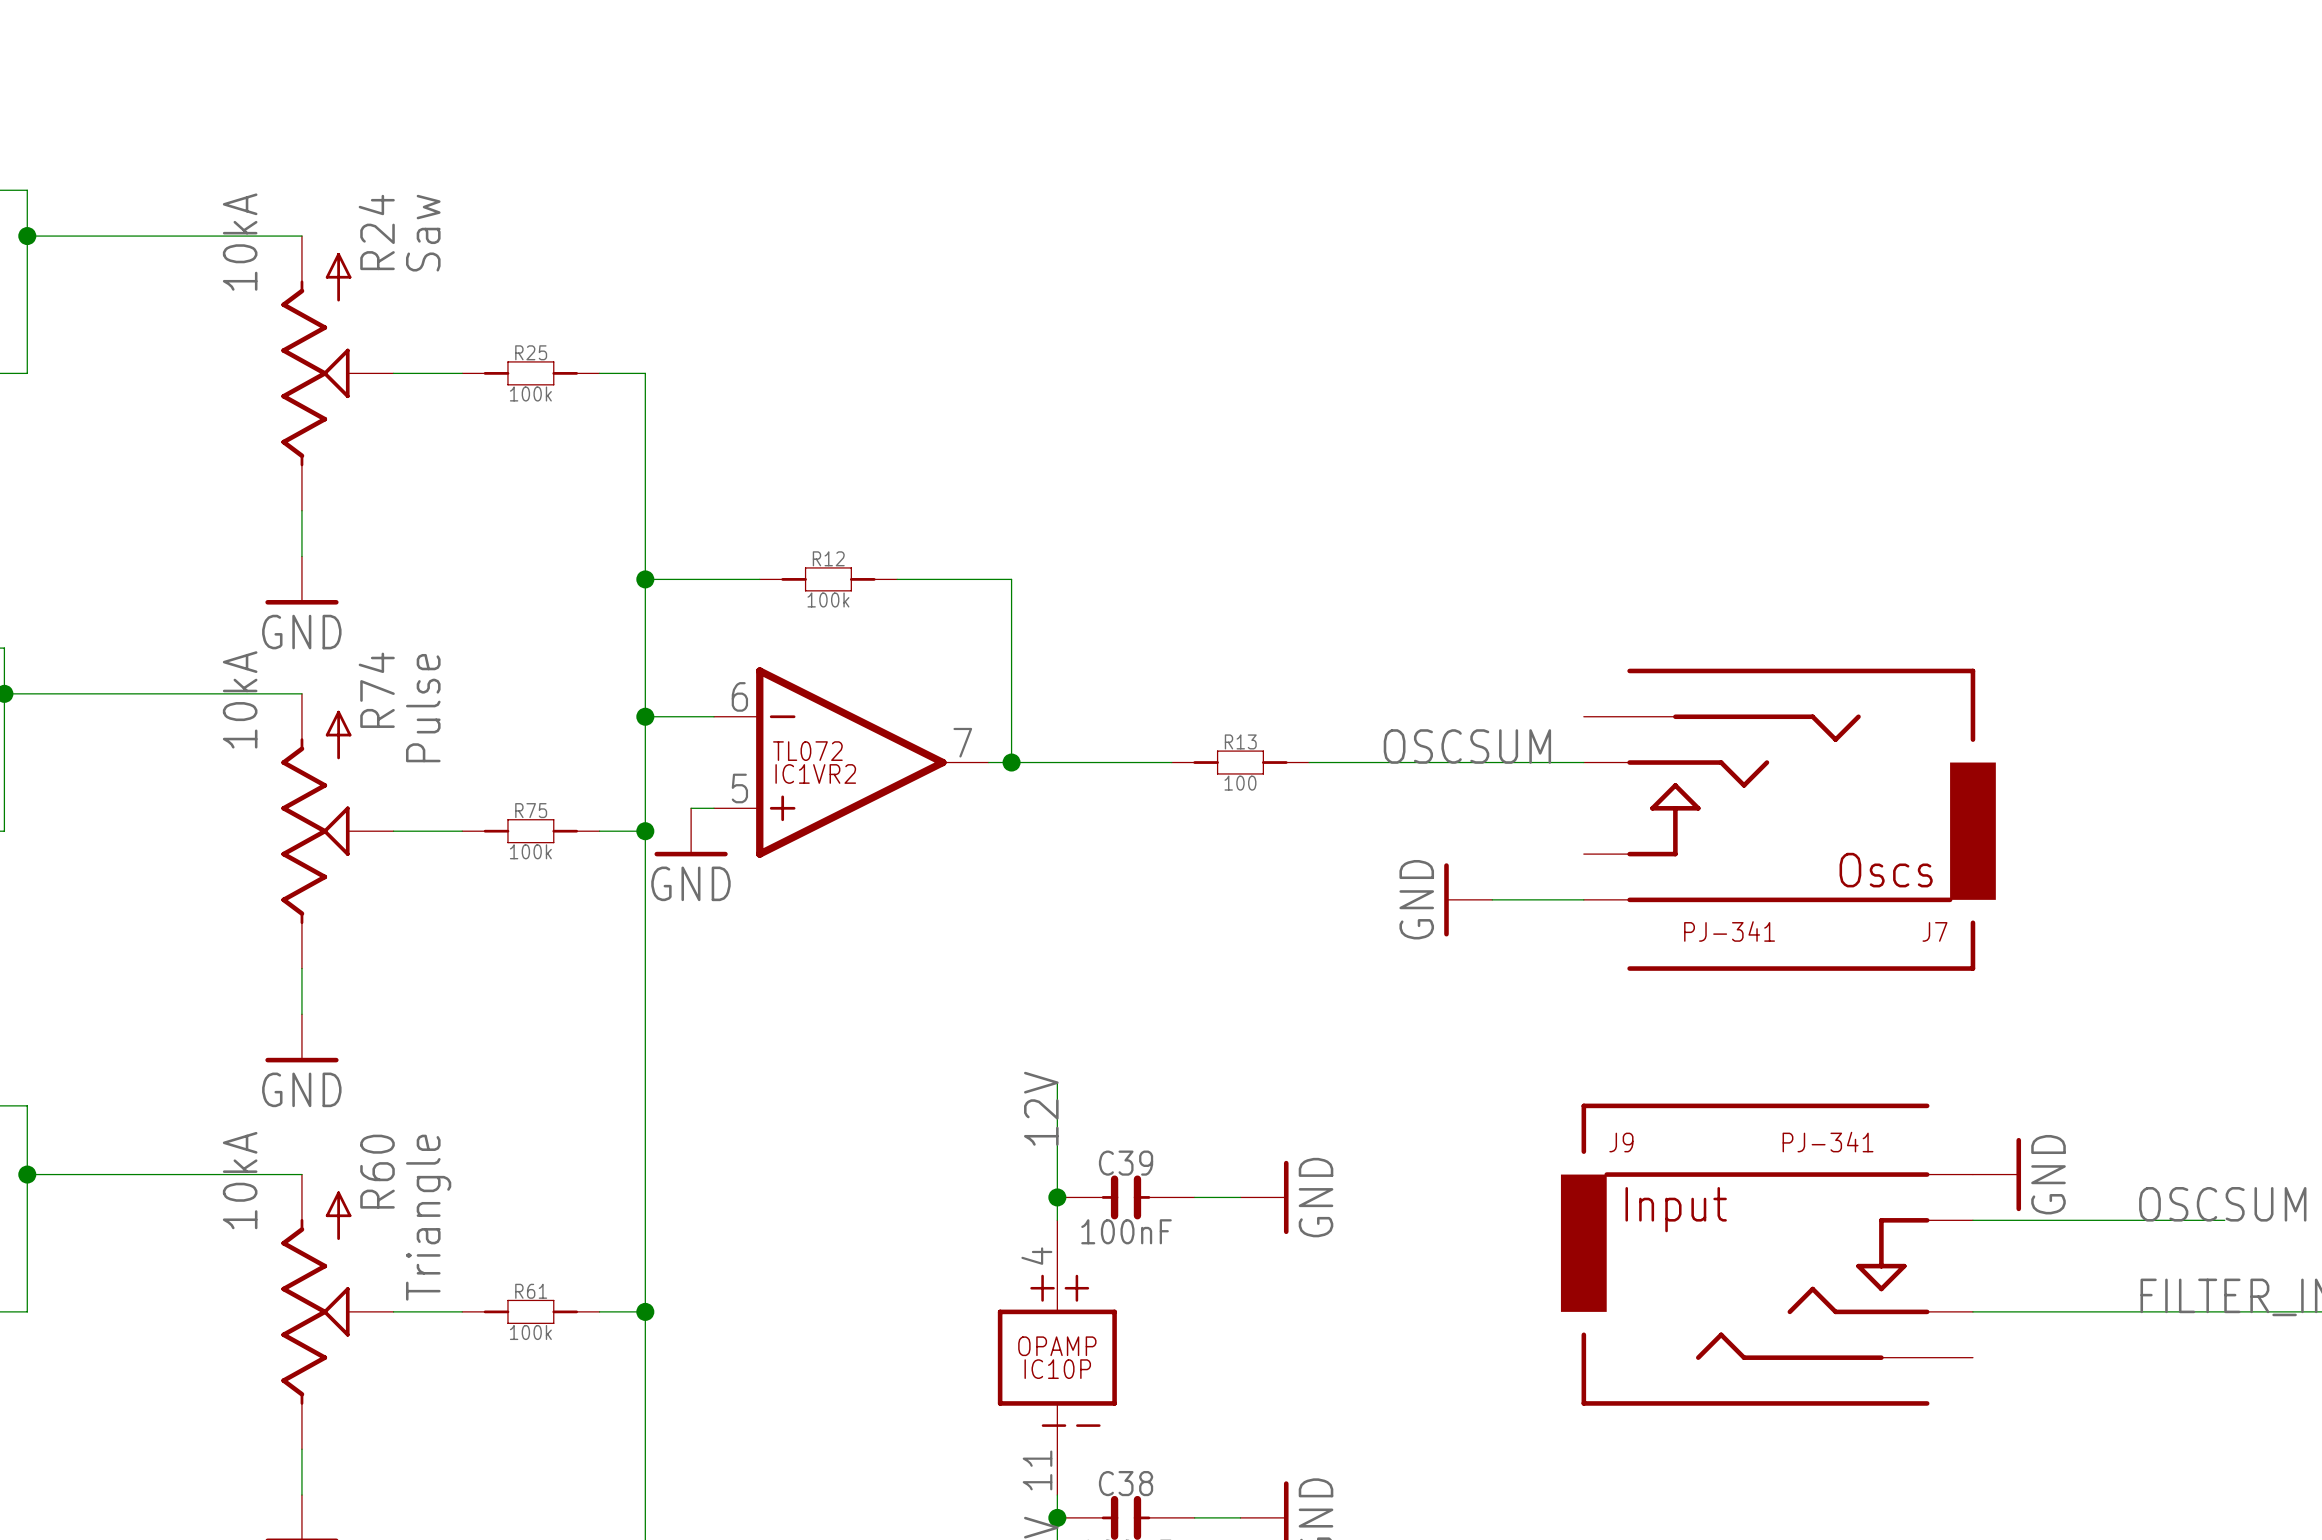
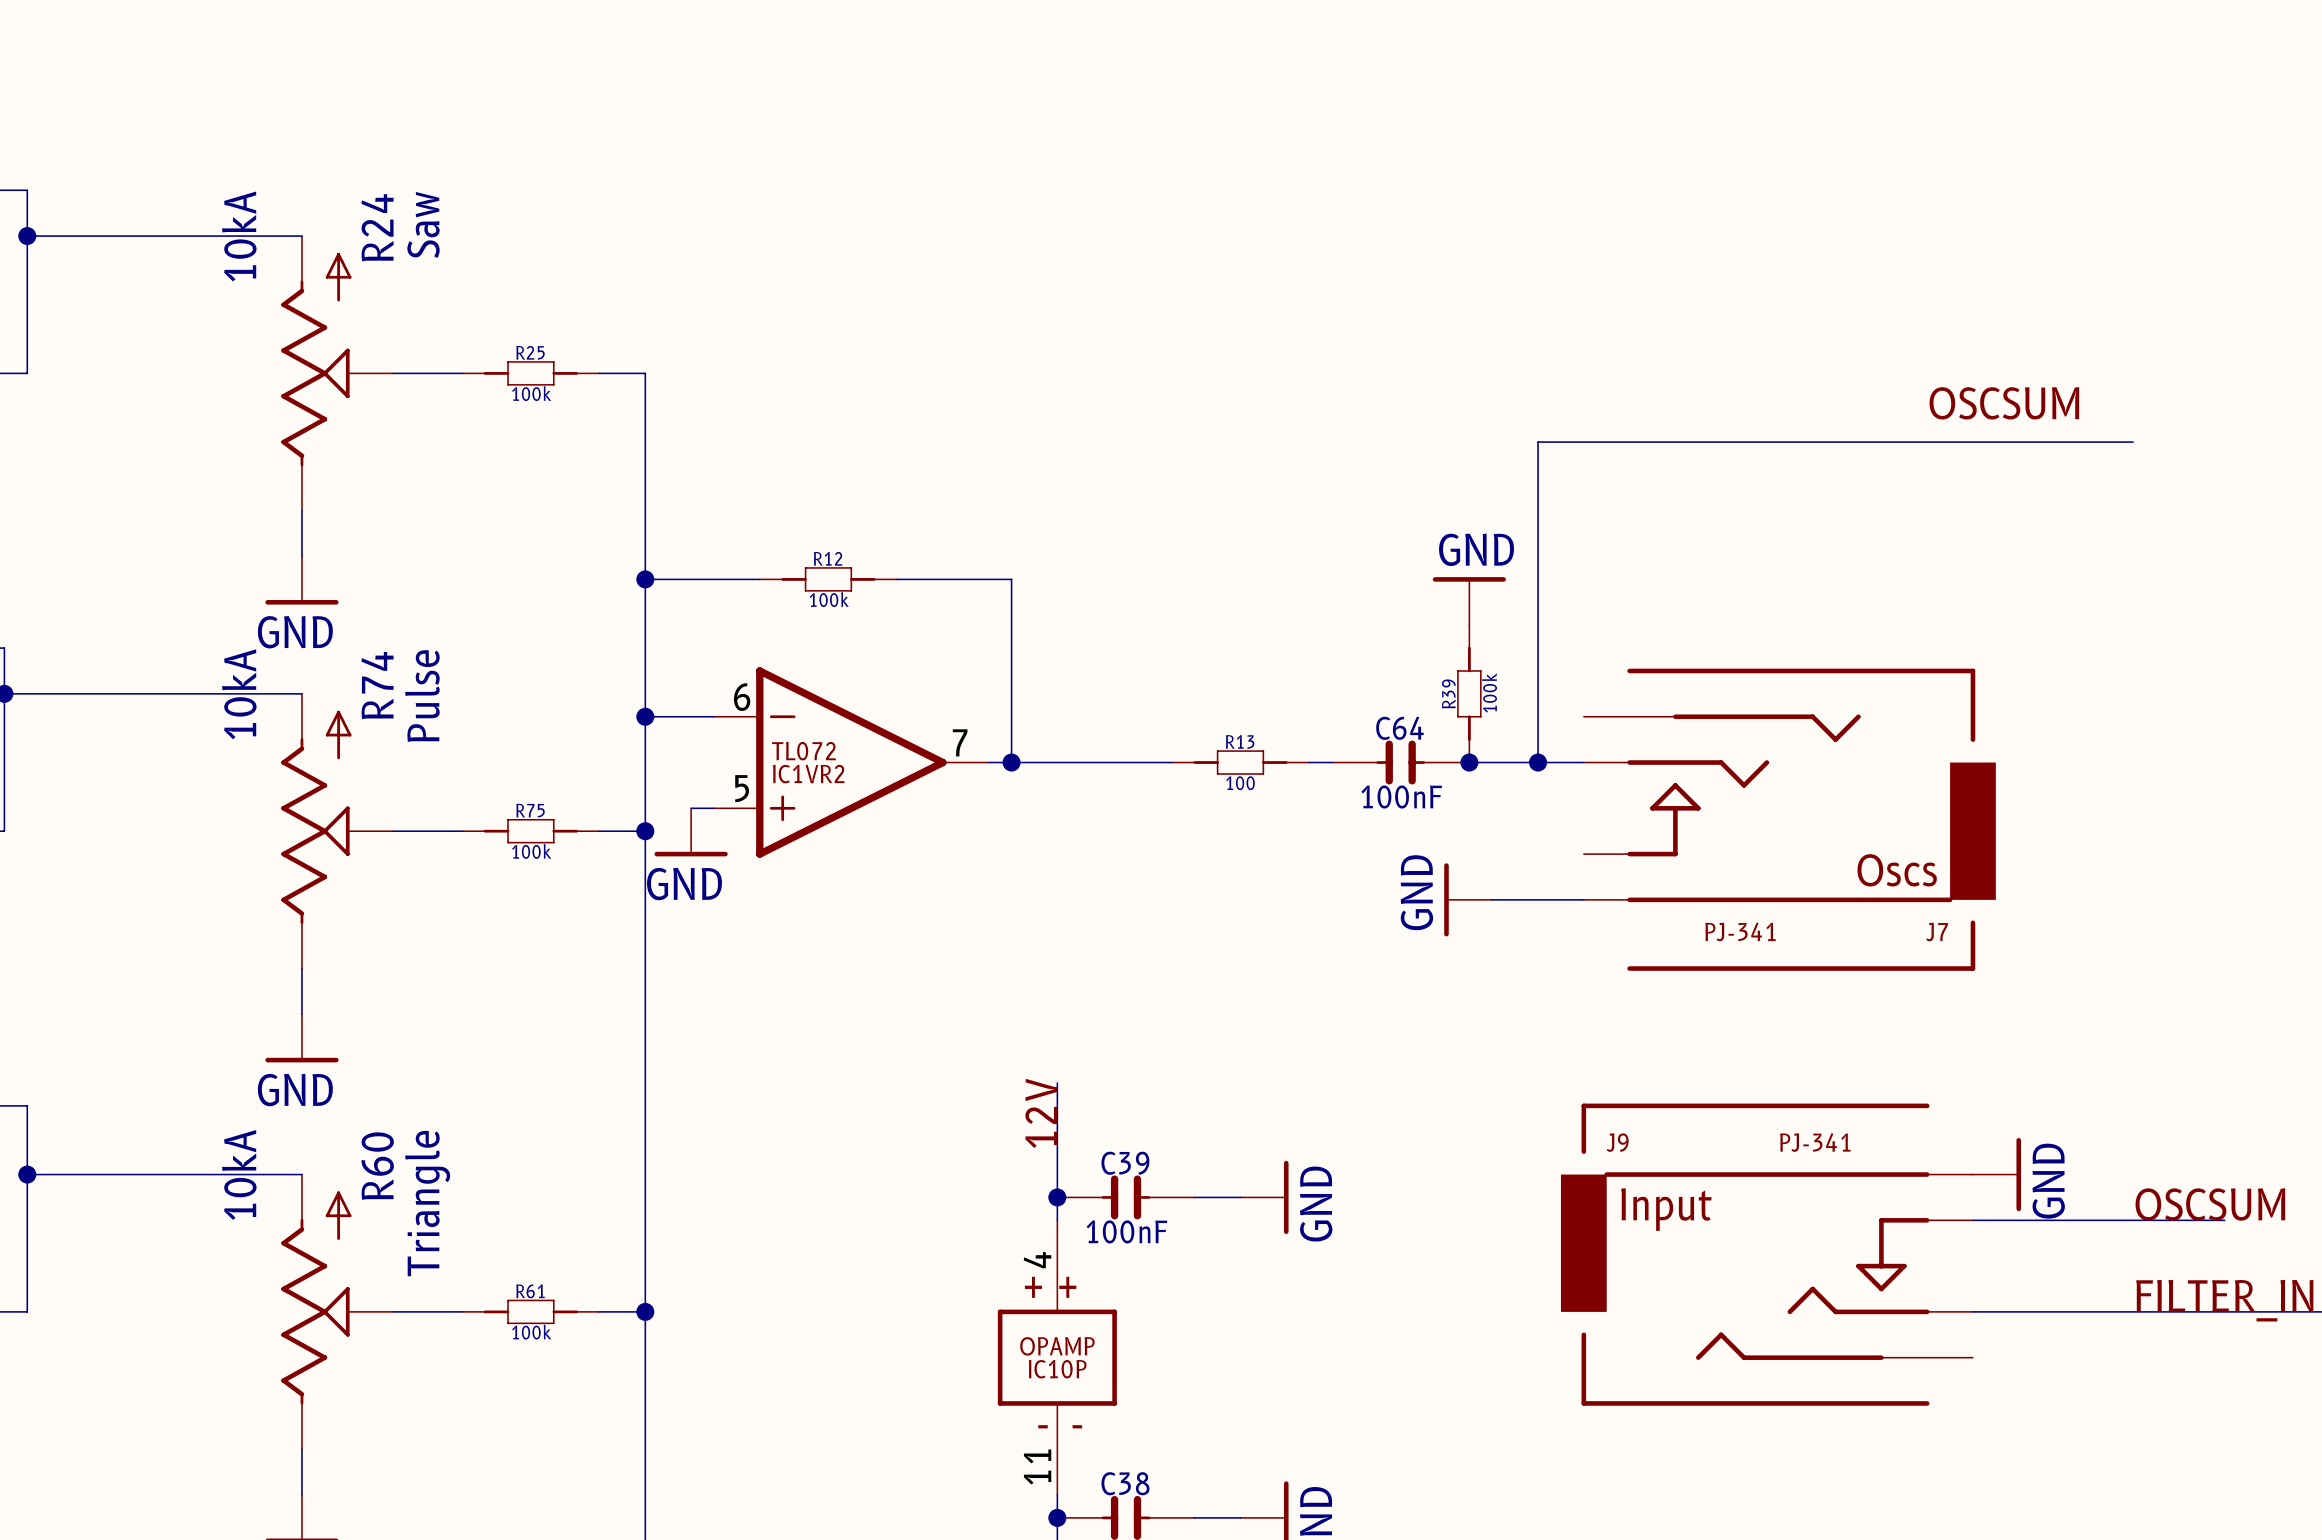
label: none -> OSCSUM (2004, 403)
wire: none -> (2133, 442) (1538, 442) (1538, 762)
power symbol: none -> GND (1469, 601)
R39: none -> 100k (1469, 693)
label: OSCSUM (1467, 746) -> none
C64: none -> 100nF (1400, 762)
junction: none -> (1469, 762)
junction: none -> (1538, 762)

